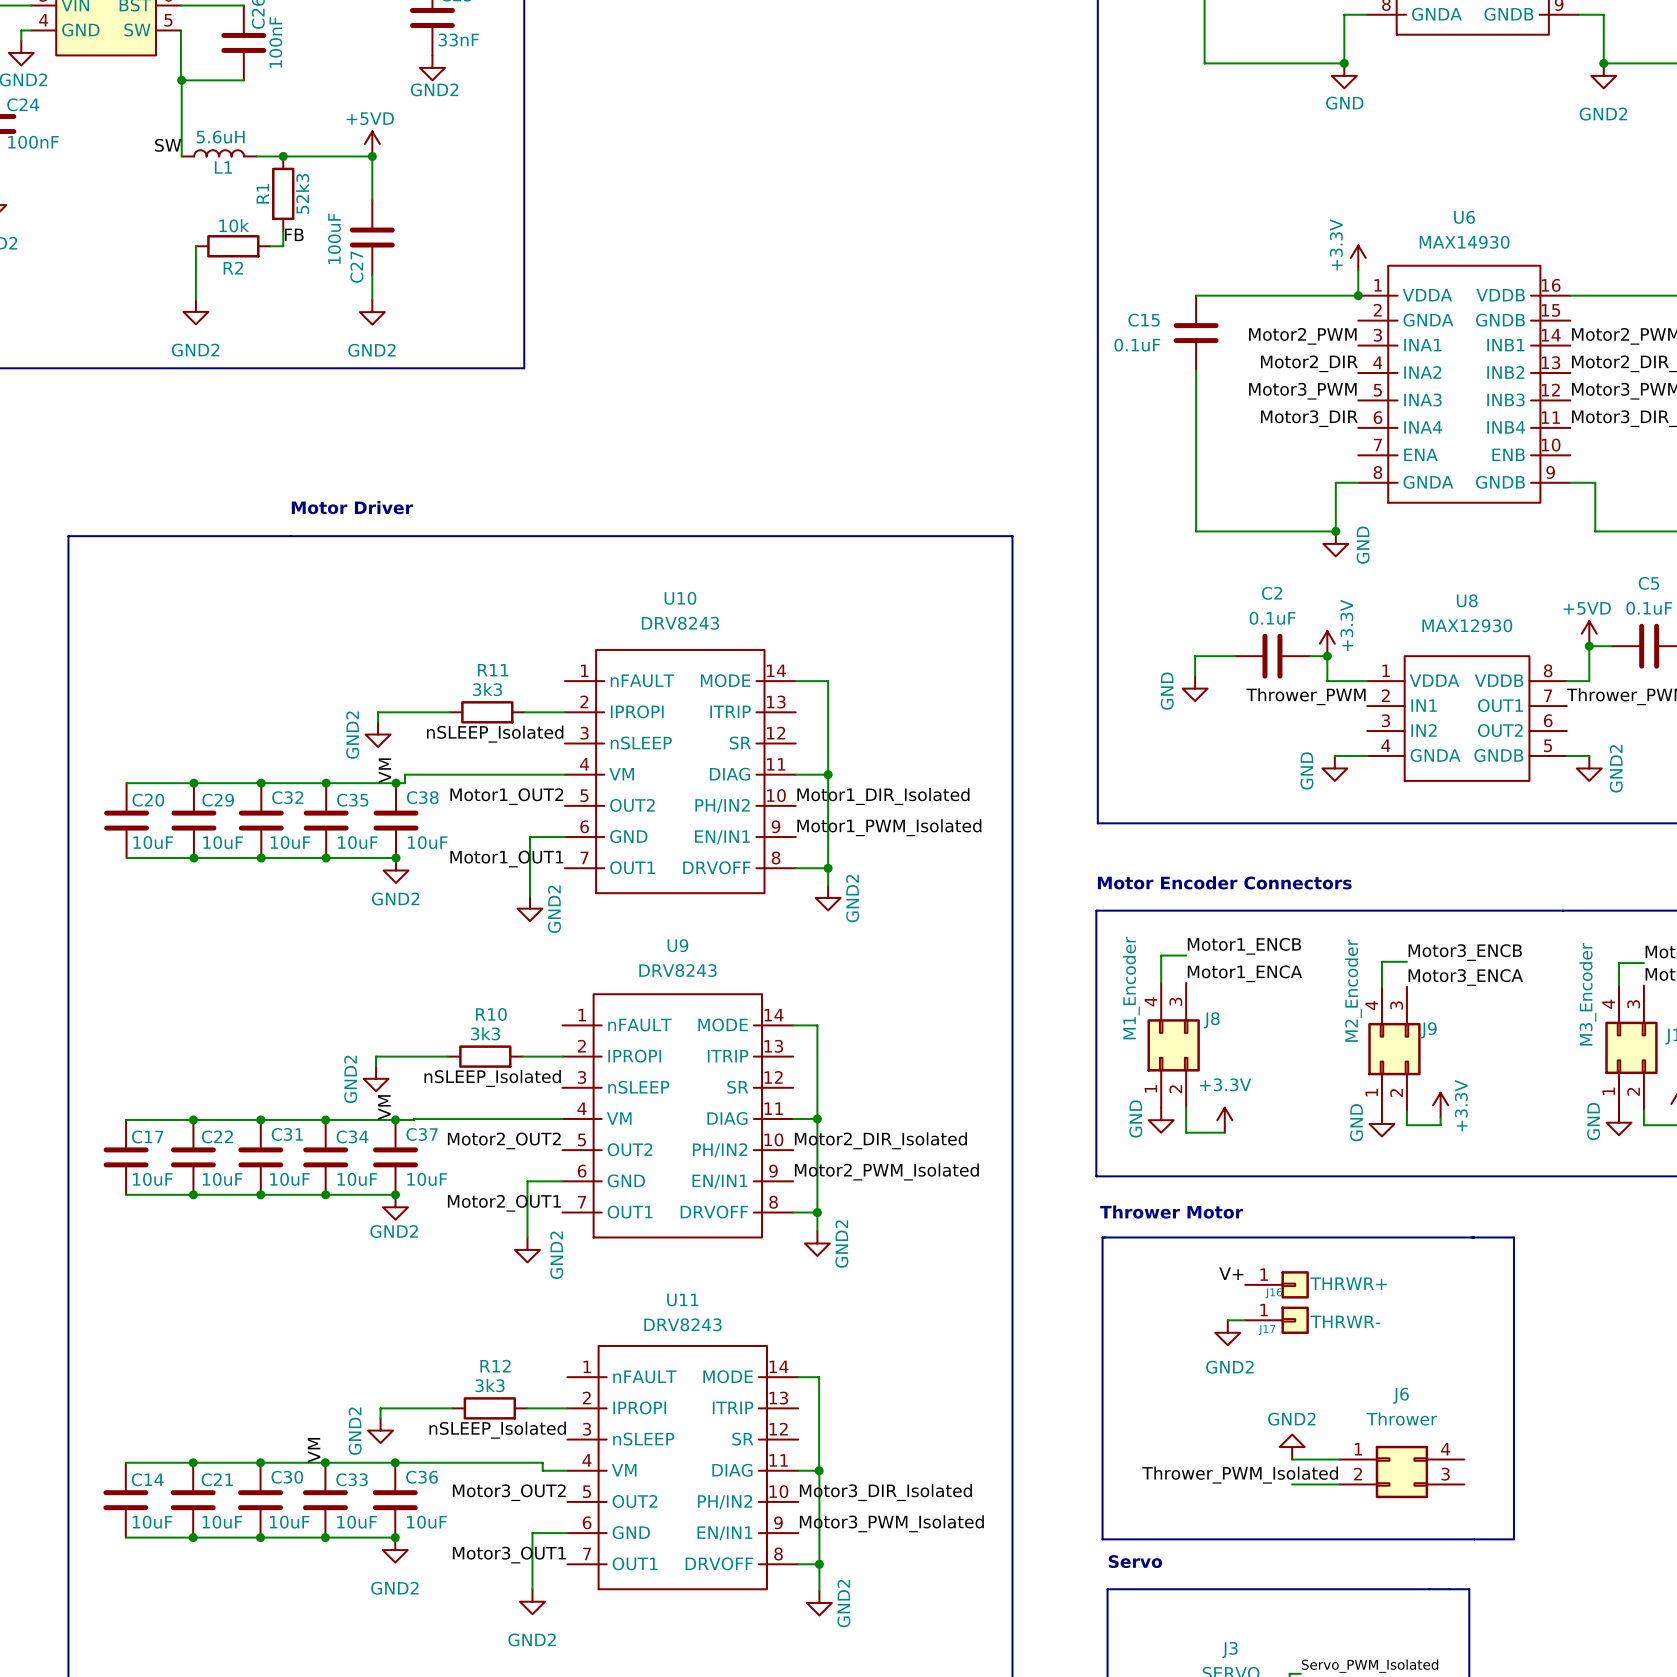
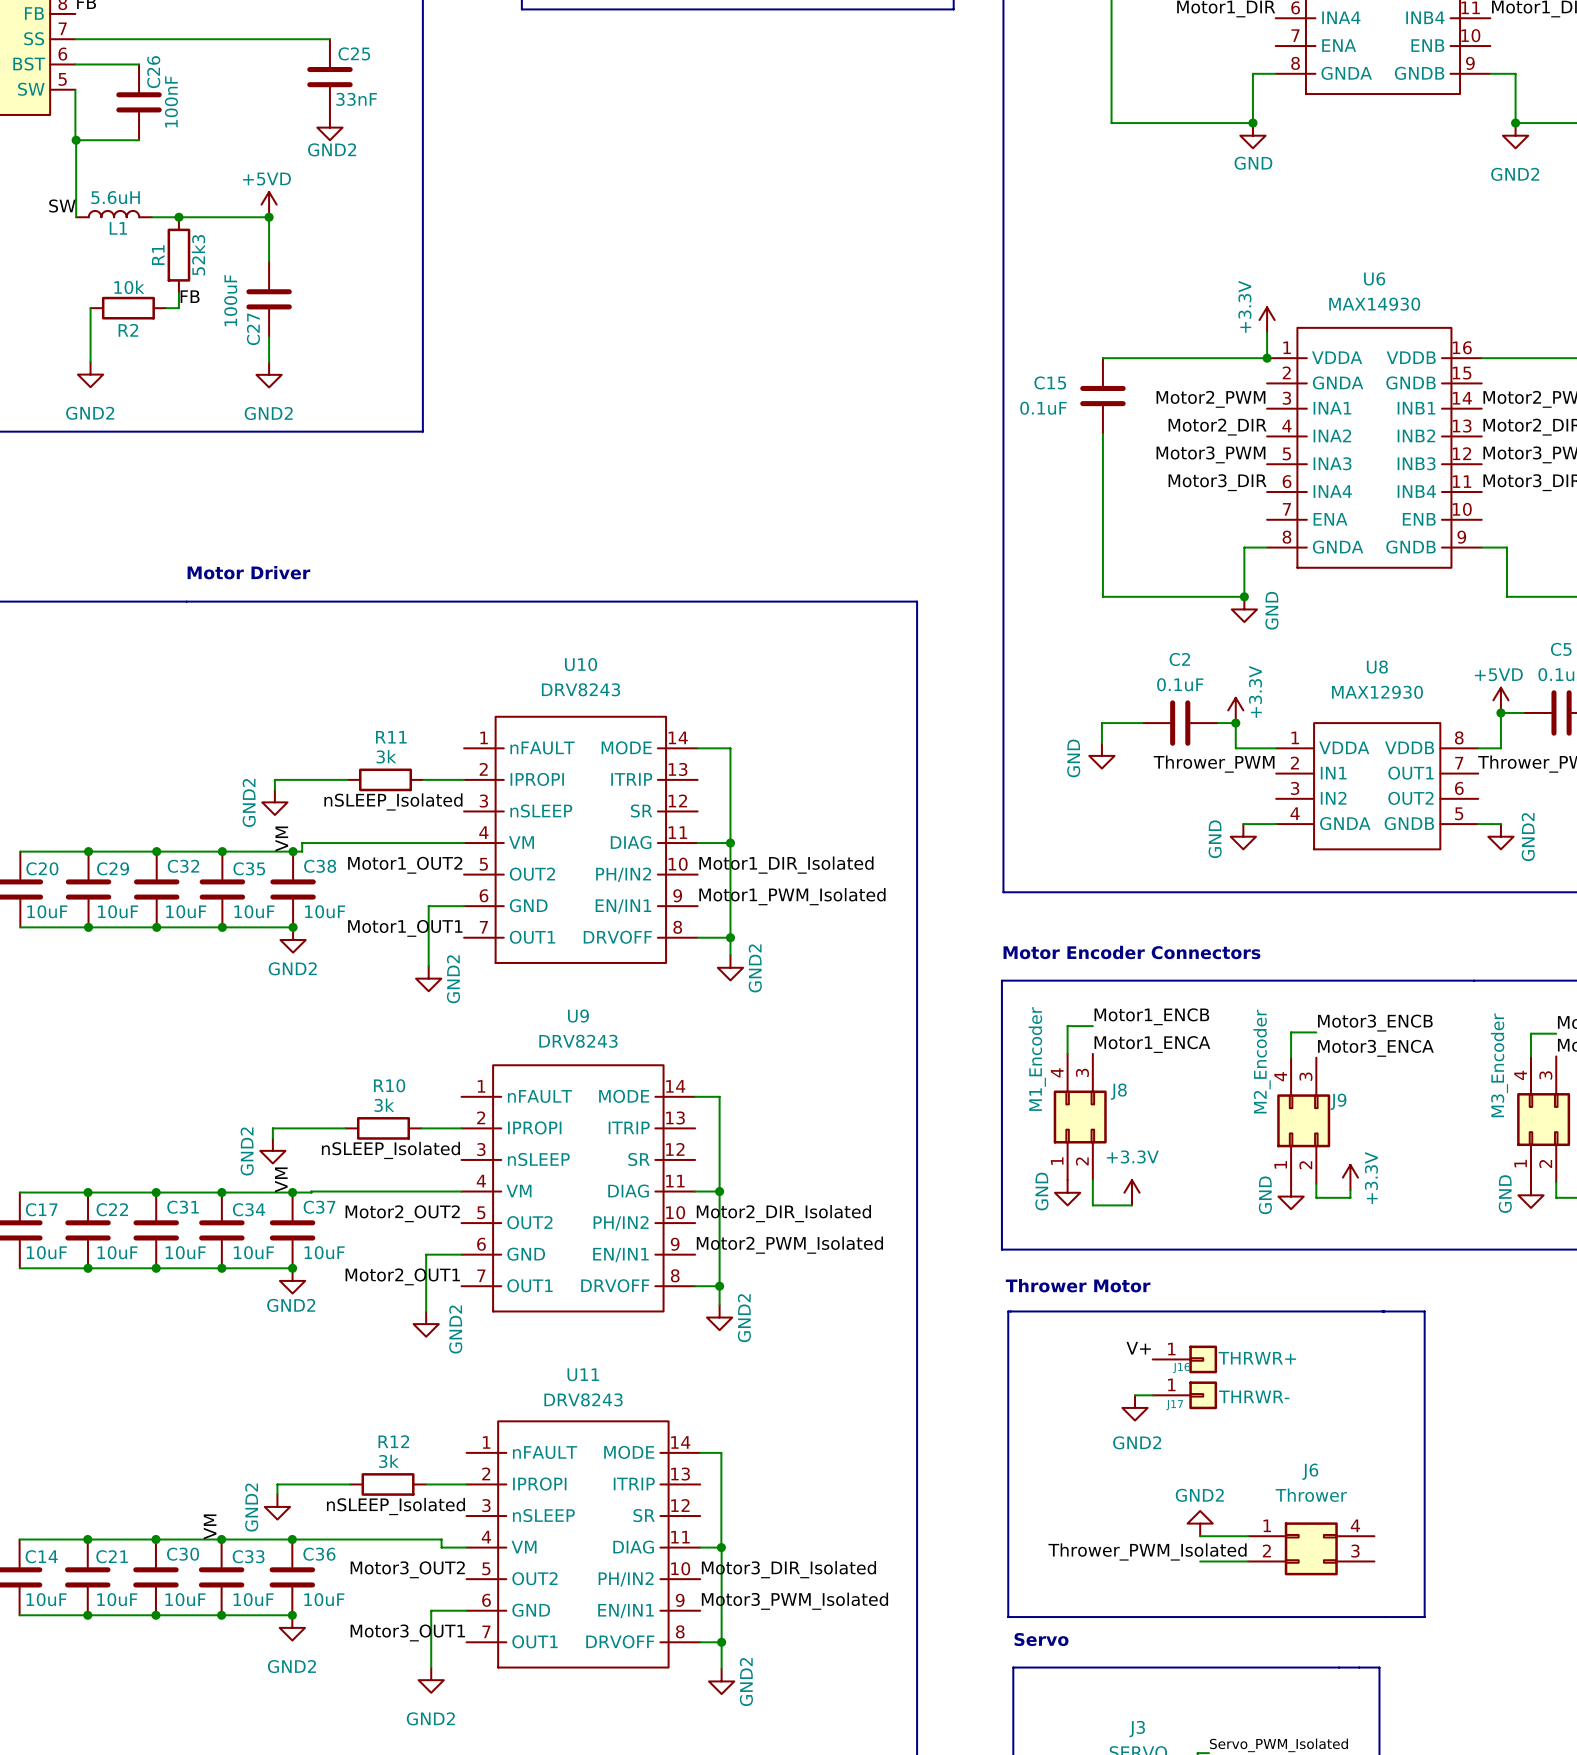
R11 value: 3k3 (487, 689) -> 3k (386, 756)
R10 value: 3k3 (485, 1033) -> 3k (384, 1105)
R12 value: 3k3 (490, 1385) -> 3k (388, 1461)

